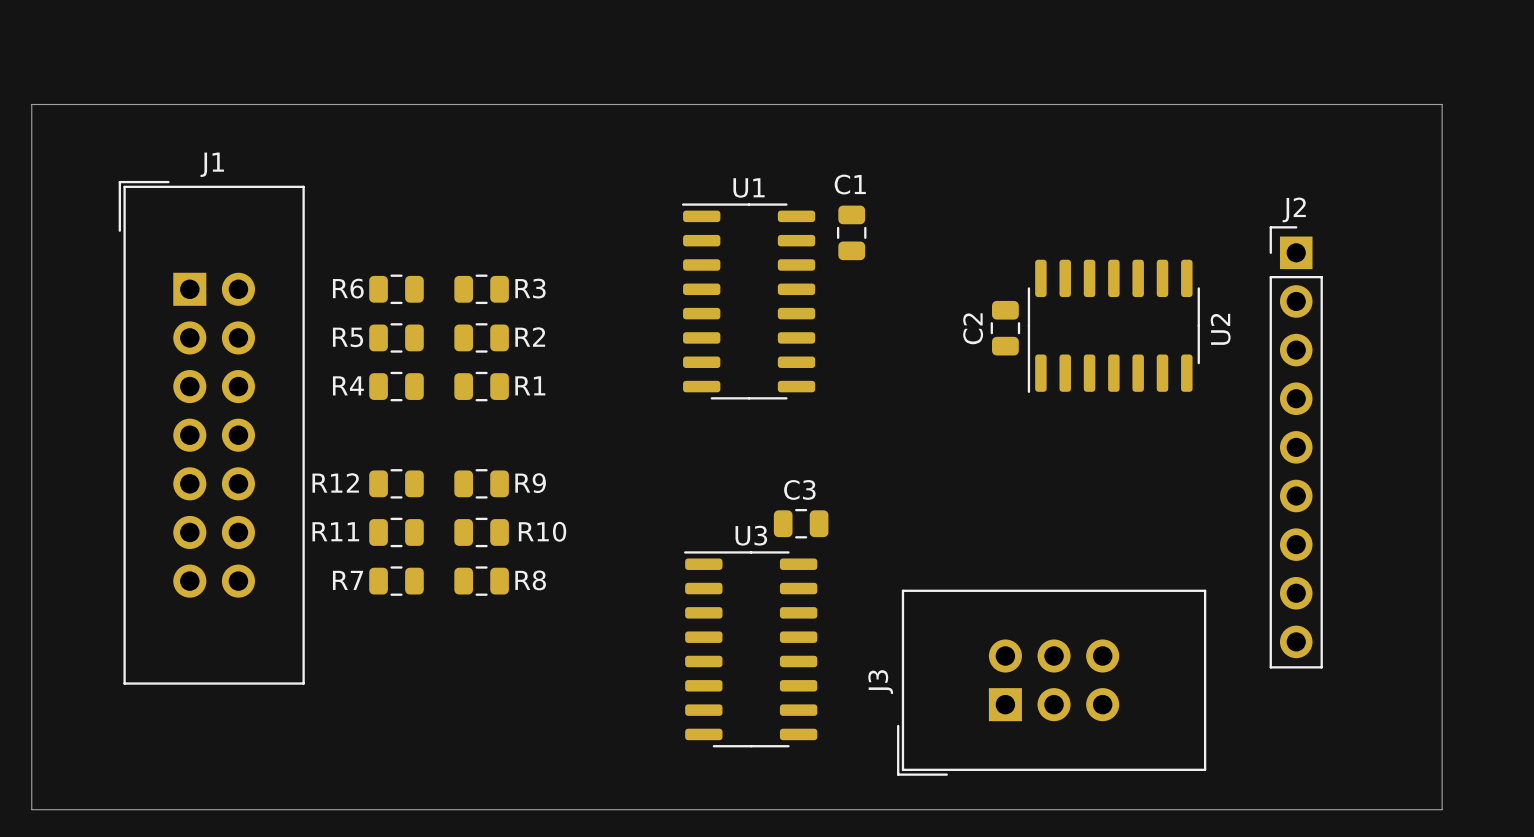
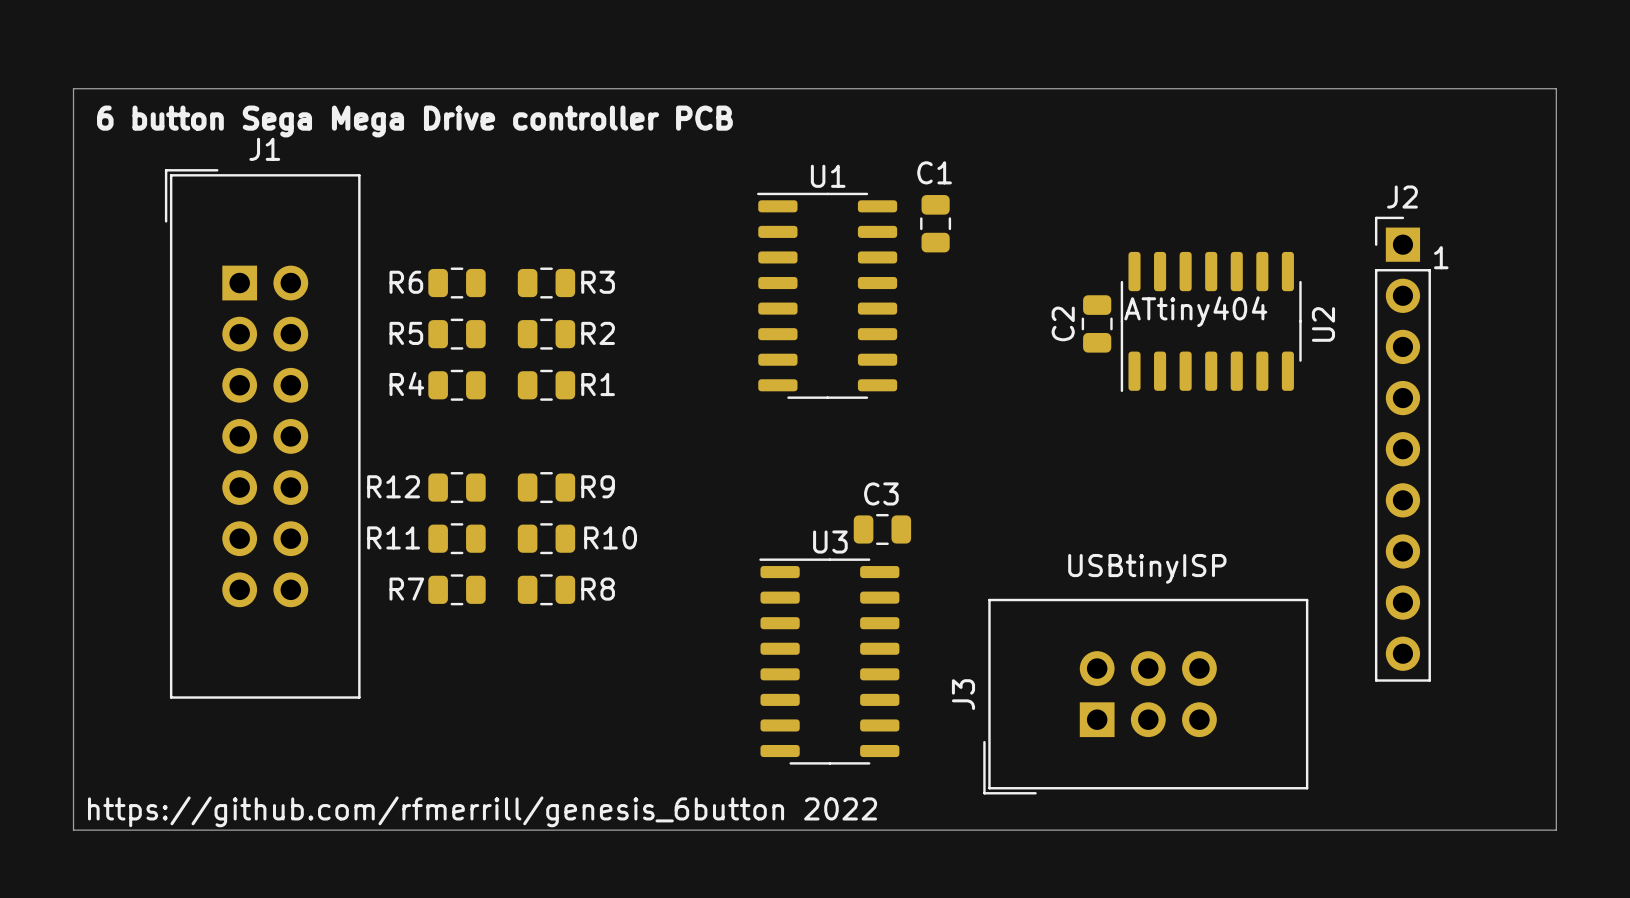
text: none -> 6 button Sega Mega Drive controller PCB (414, 121)
text: none -> 1 (1441, 257)
text: none -> ATtiny404 (1195, 311)
text: none -> USBtinyISP (1147, 568)
text: none -> https://github.com/rfmerrill/genesis_6button 2022 (482, 811)

